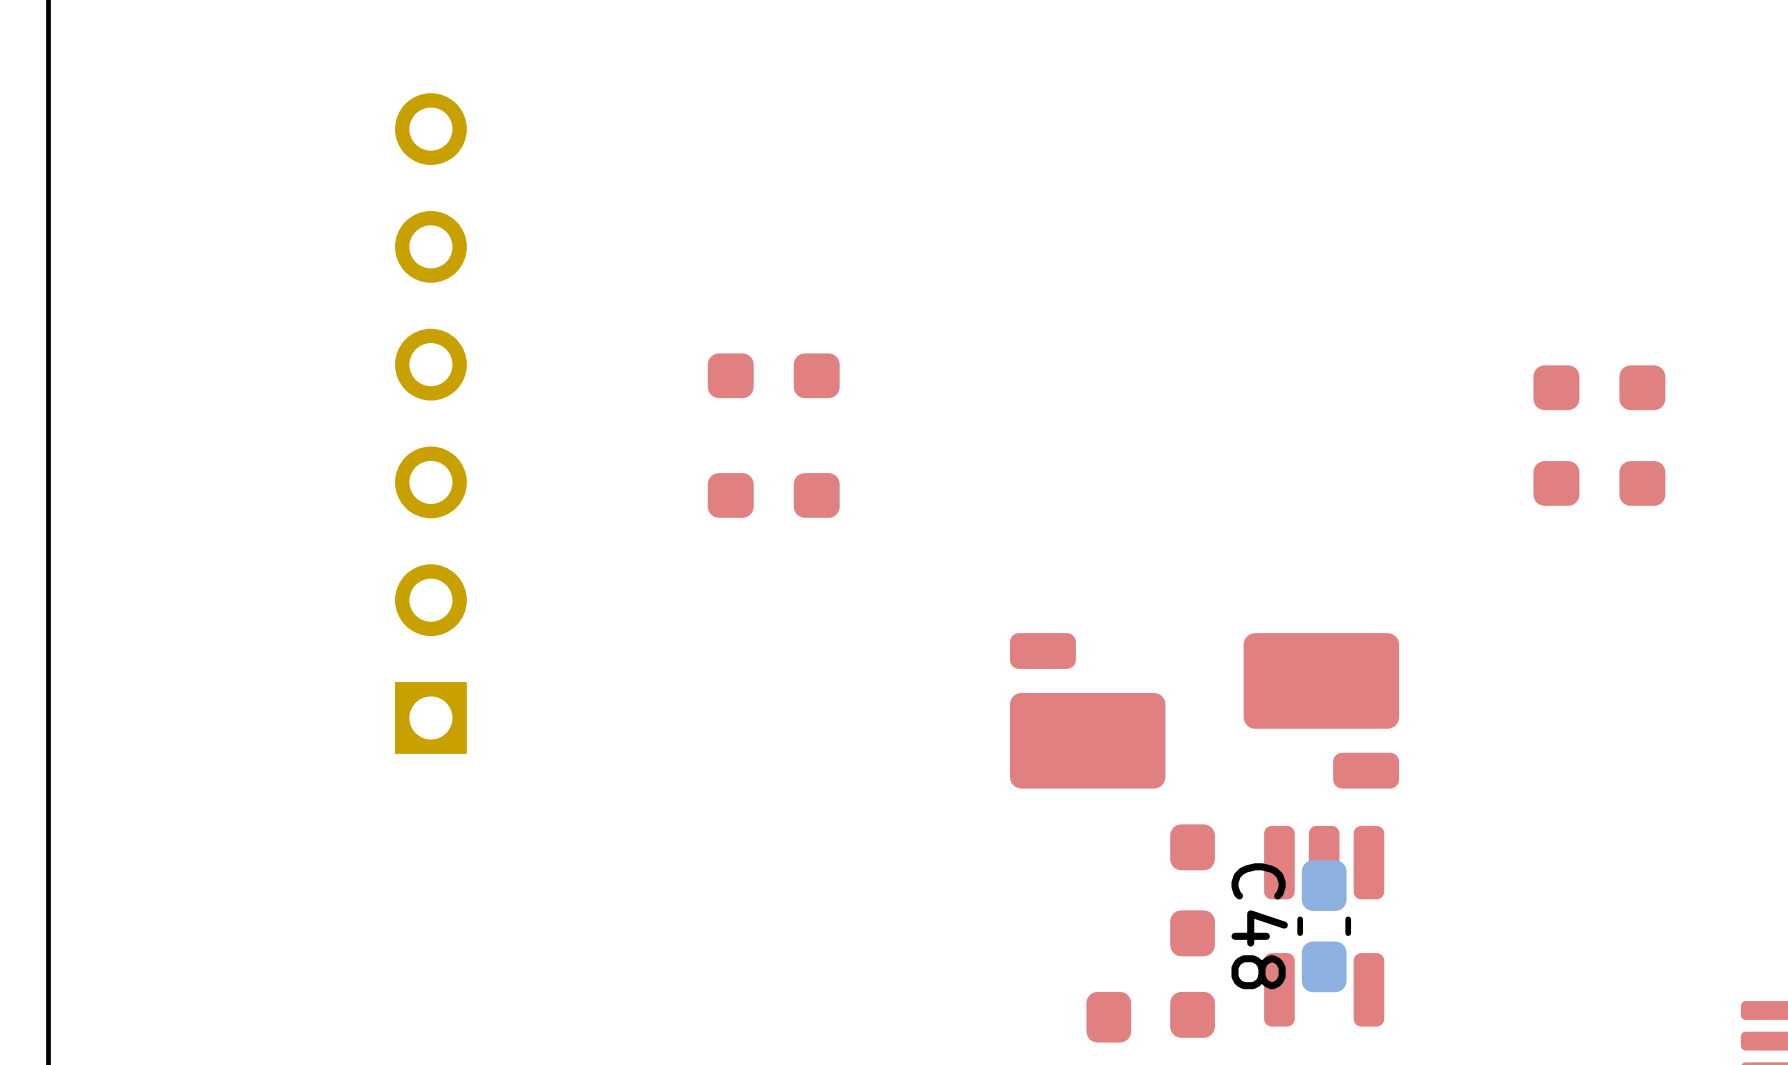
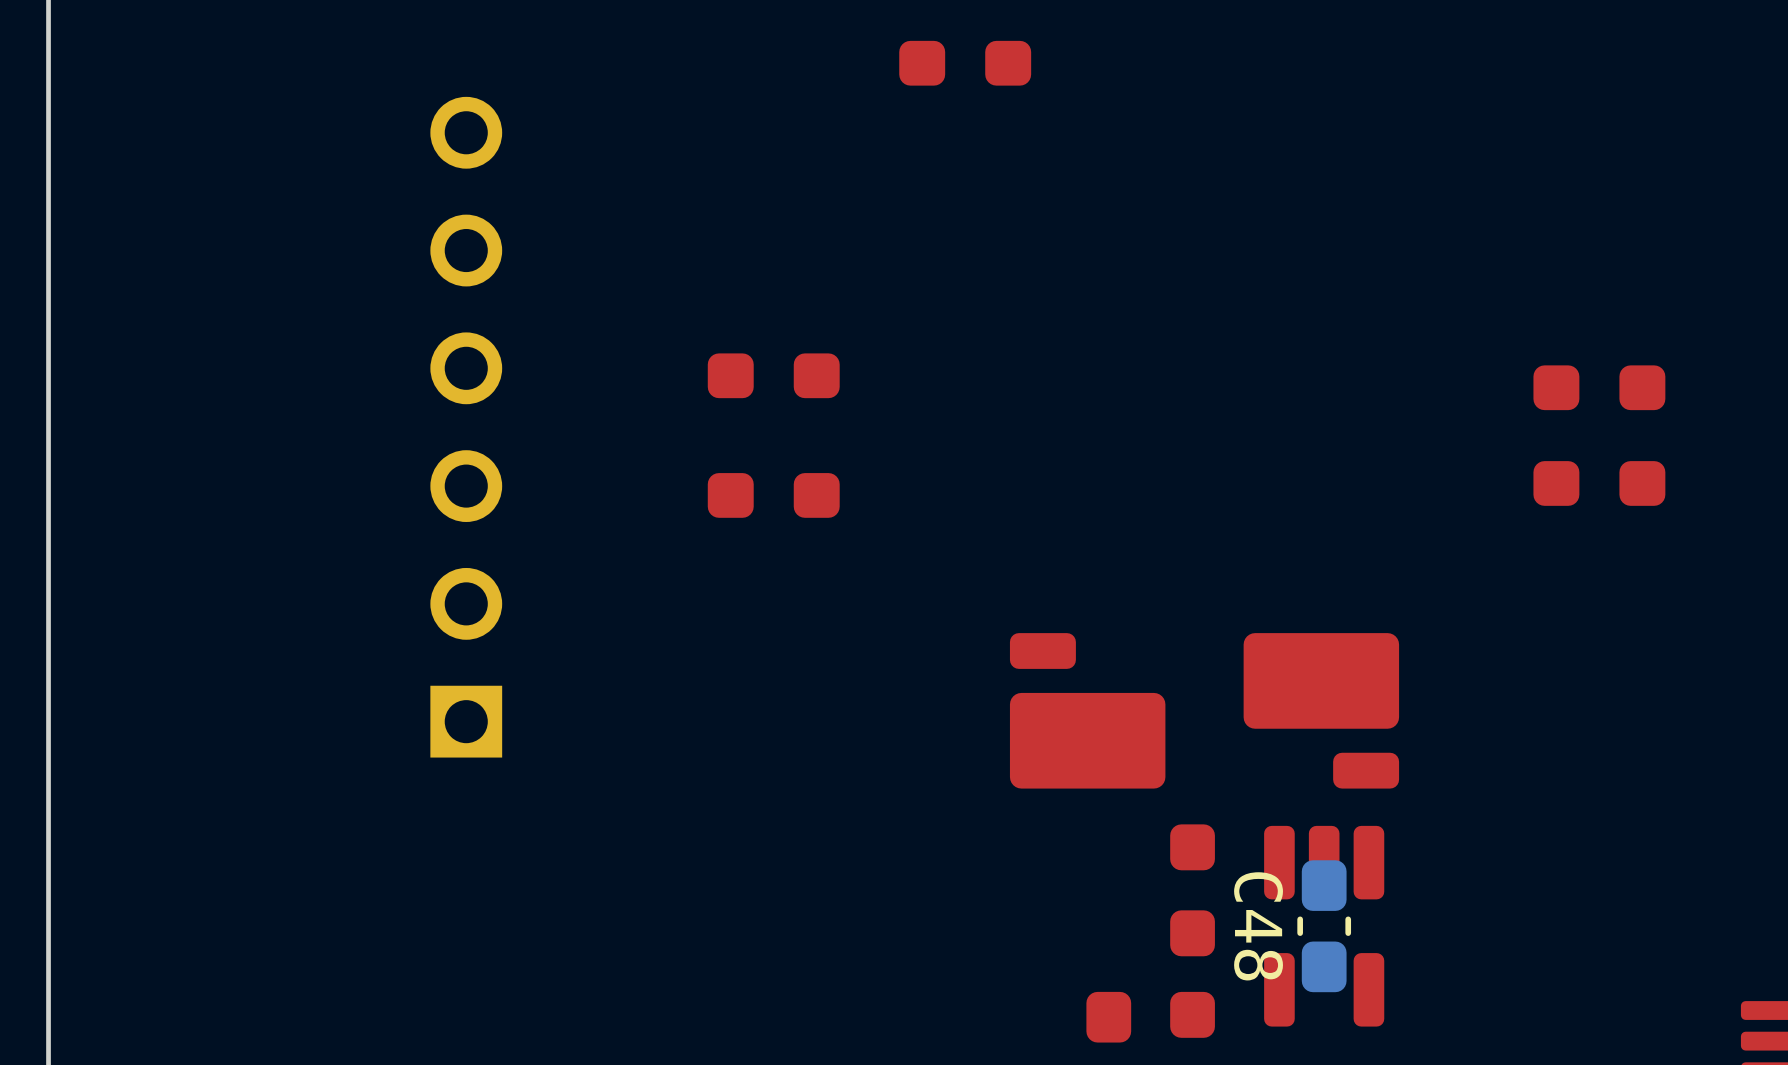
part: none -> (965, 63)
part position: (430, 423) -> (466, 427)

